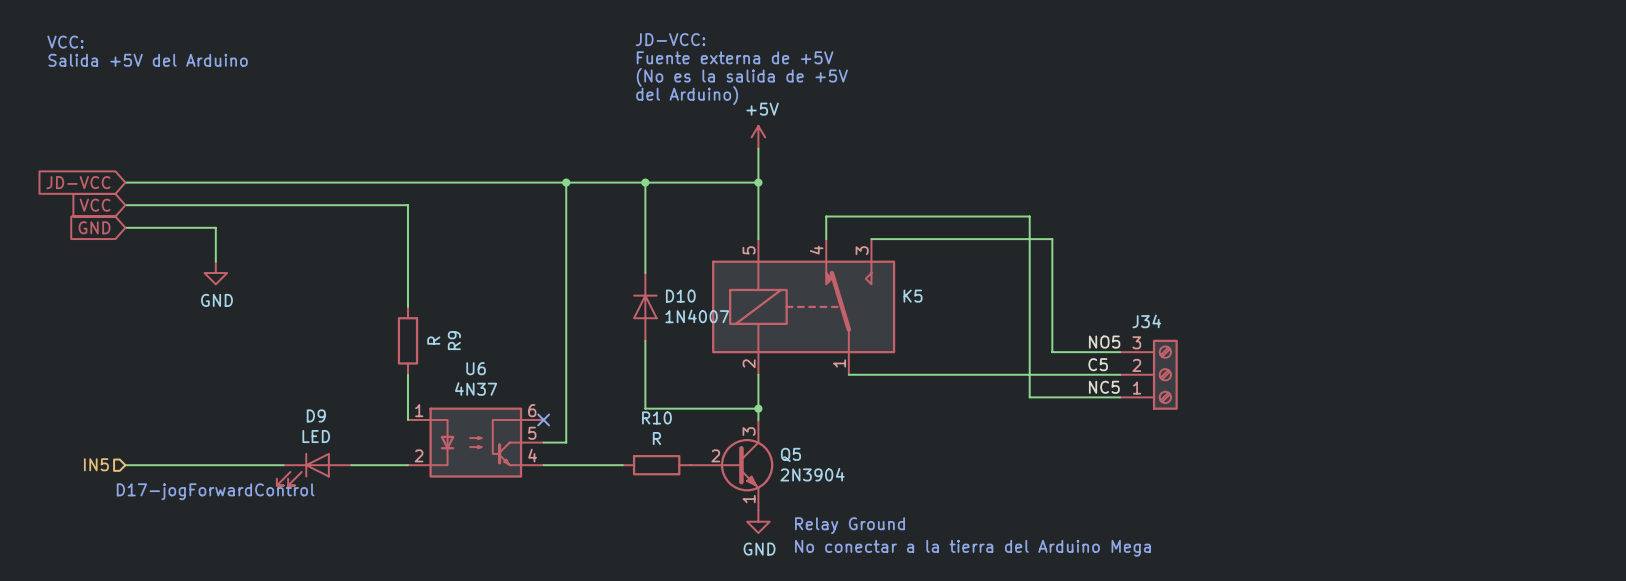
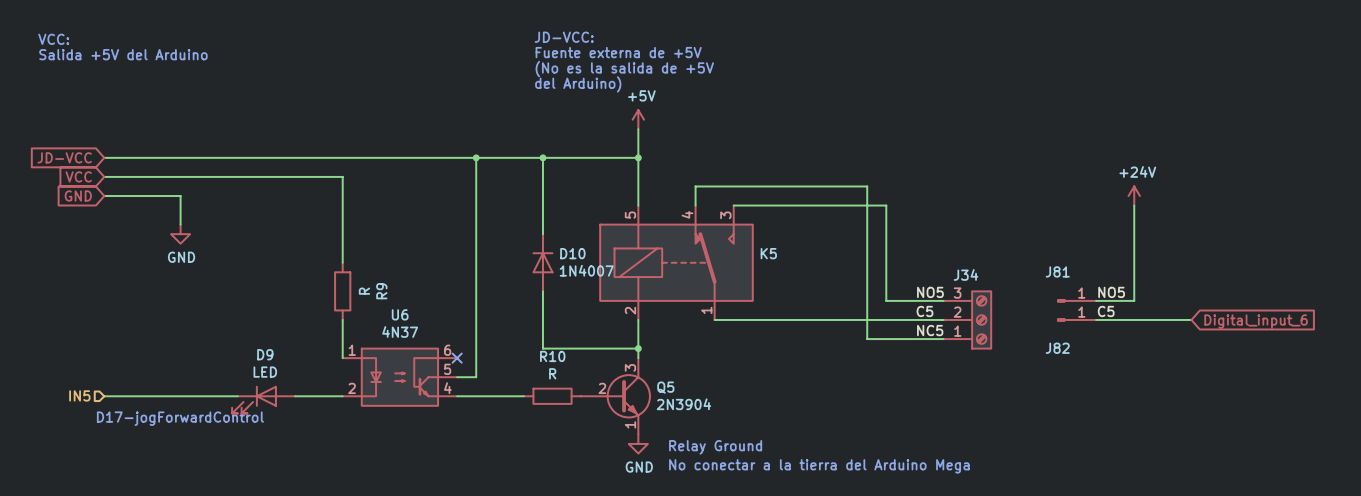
power symbol: none -> +24V (1134, 196)
wire: none -> (1134, 205) (1134, 300) (1096, 300)
label: none -> NO5 (1111, 292)
J81: none -> (1076, 300)
label: none -> C5 (1106, 311)
J82: none -> (1076, 319)
wire: none -> (1096, 319) (1191, 319)
global label: none -> Digital_input_6 (1256, 321)

